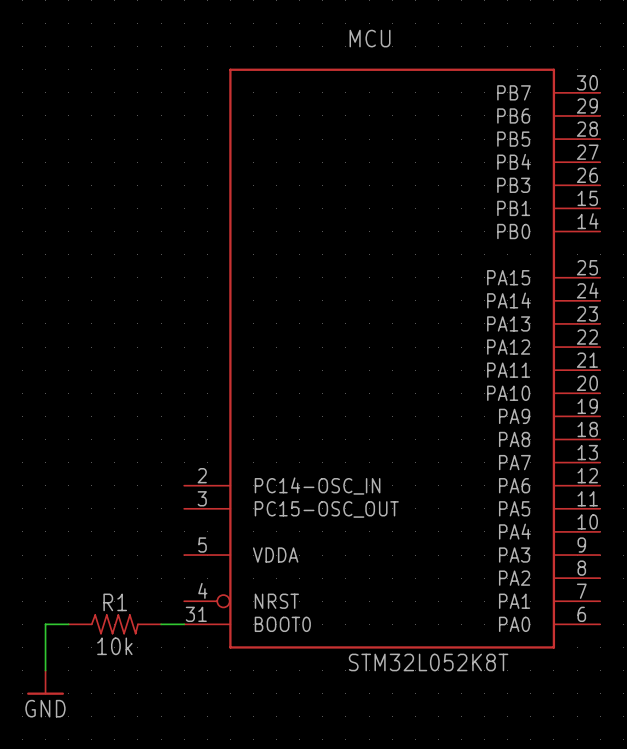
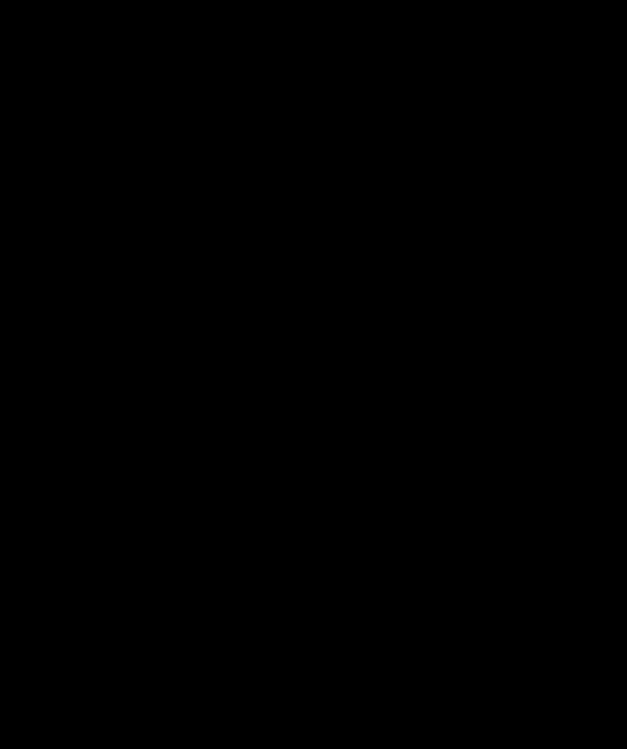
MCU: STM32L052K8T (392, 358) -> none
wire: (68, 624) (45, 624) (45, 670) -> none
R1: 10k (114, 624) -> none
wire: (161, 624) (184, 624) -> none
power symbol: GND (45, 682) -> none

